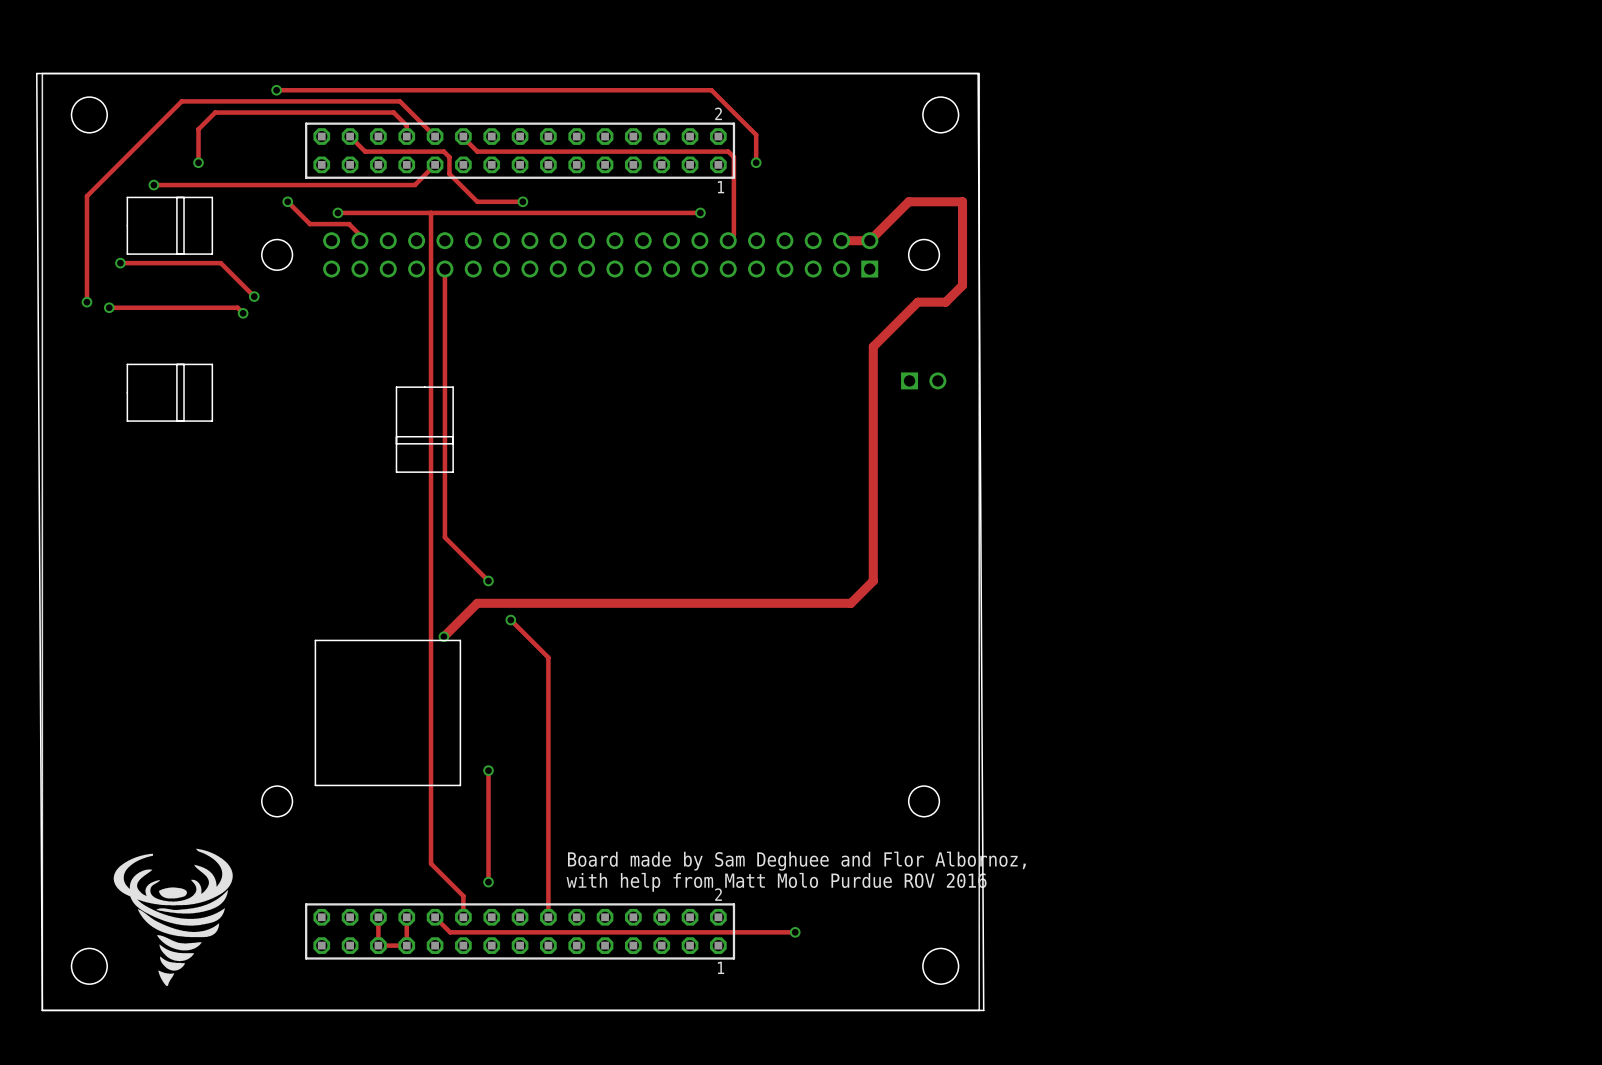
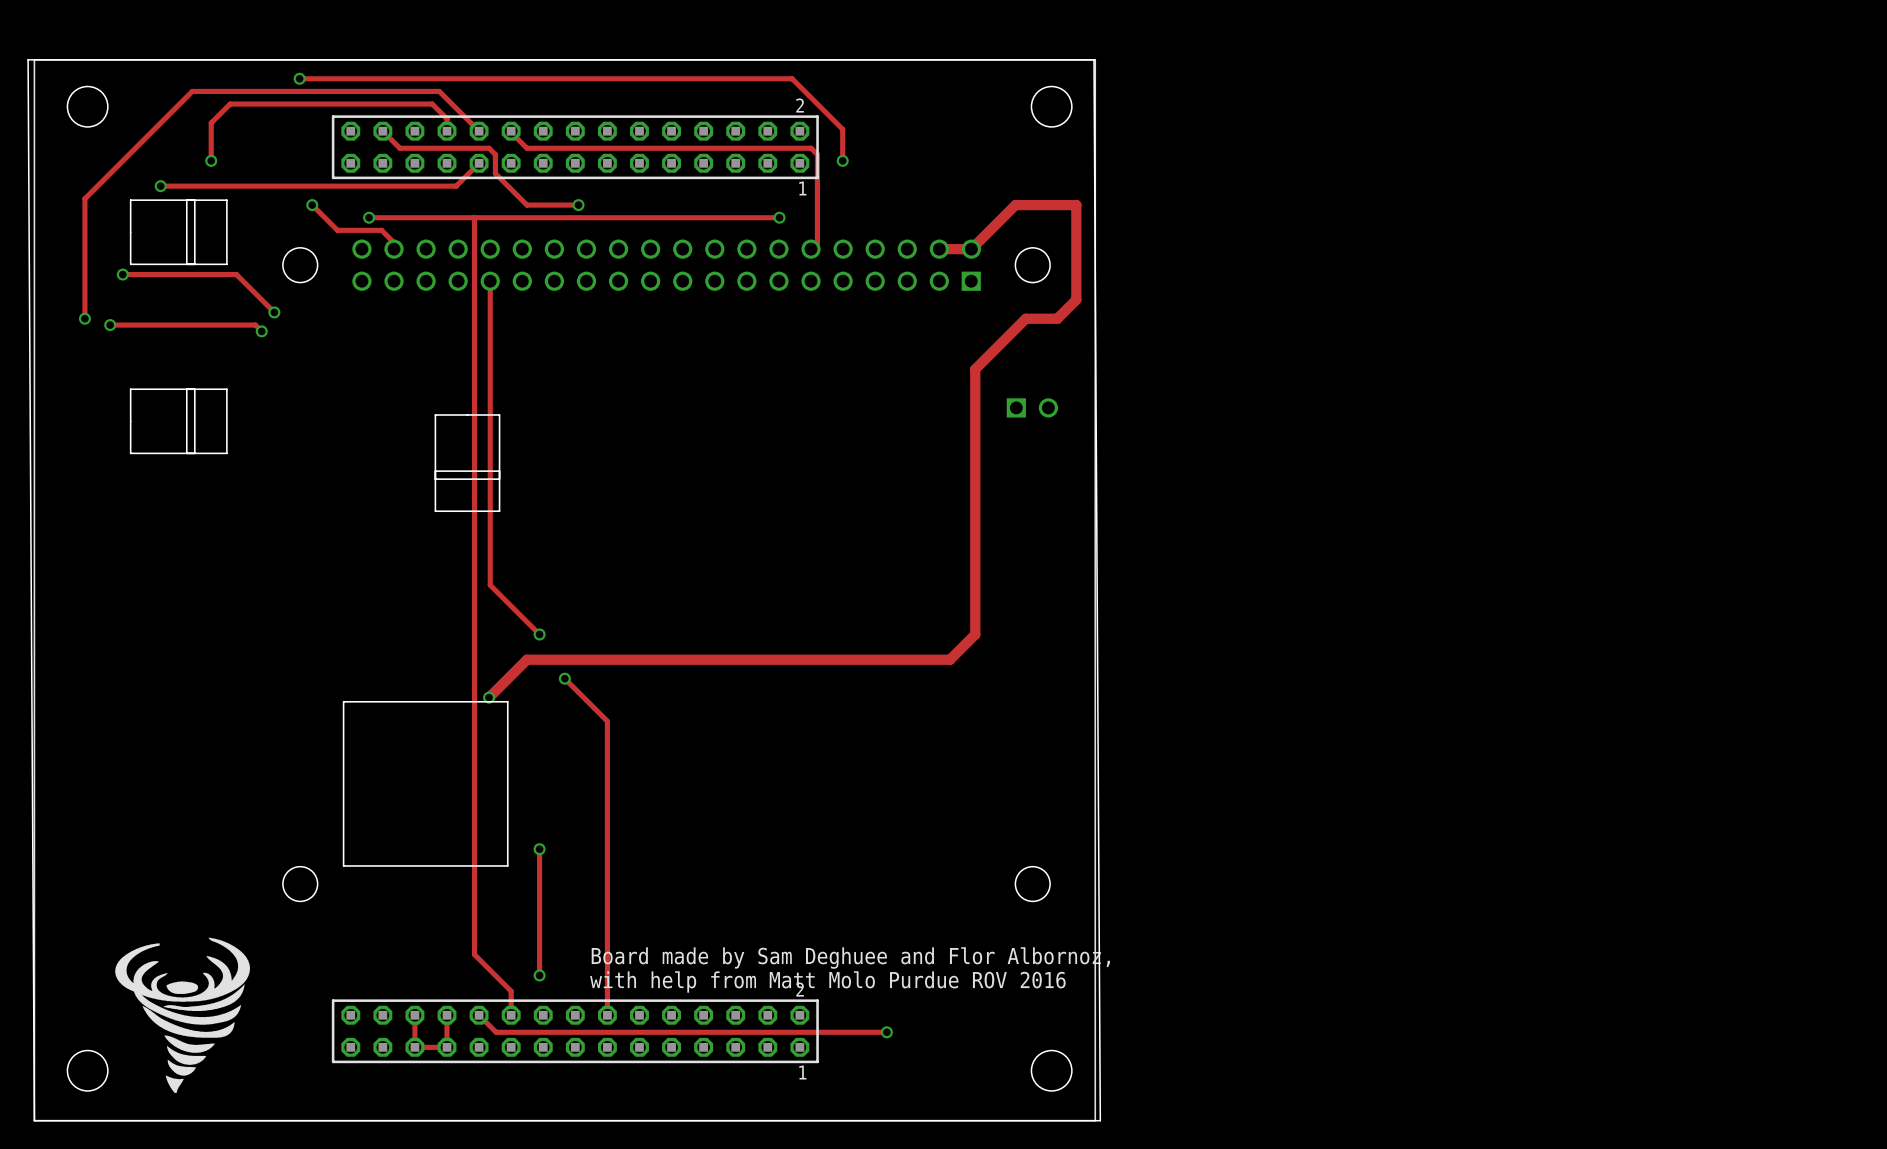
text position: Board made by Sam Deghuee and Flor Albornoz, (796, 861) -> Board made by Sam Deghuee and Flor Albornoz, (850, 957)
text position: with help from Matt Molo Purdue ROV 2016 (776, 882) -> with help from Matt Molo Purdue ROV 2016 (827, 981)

